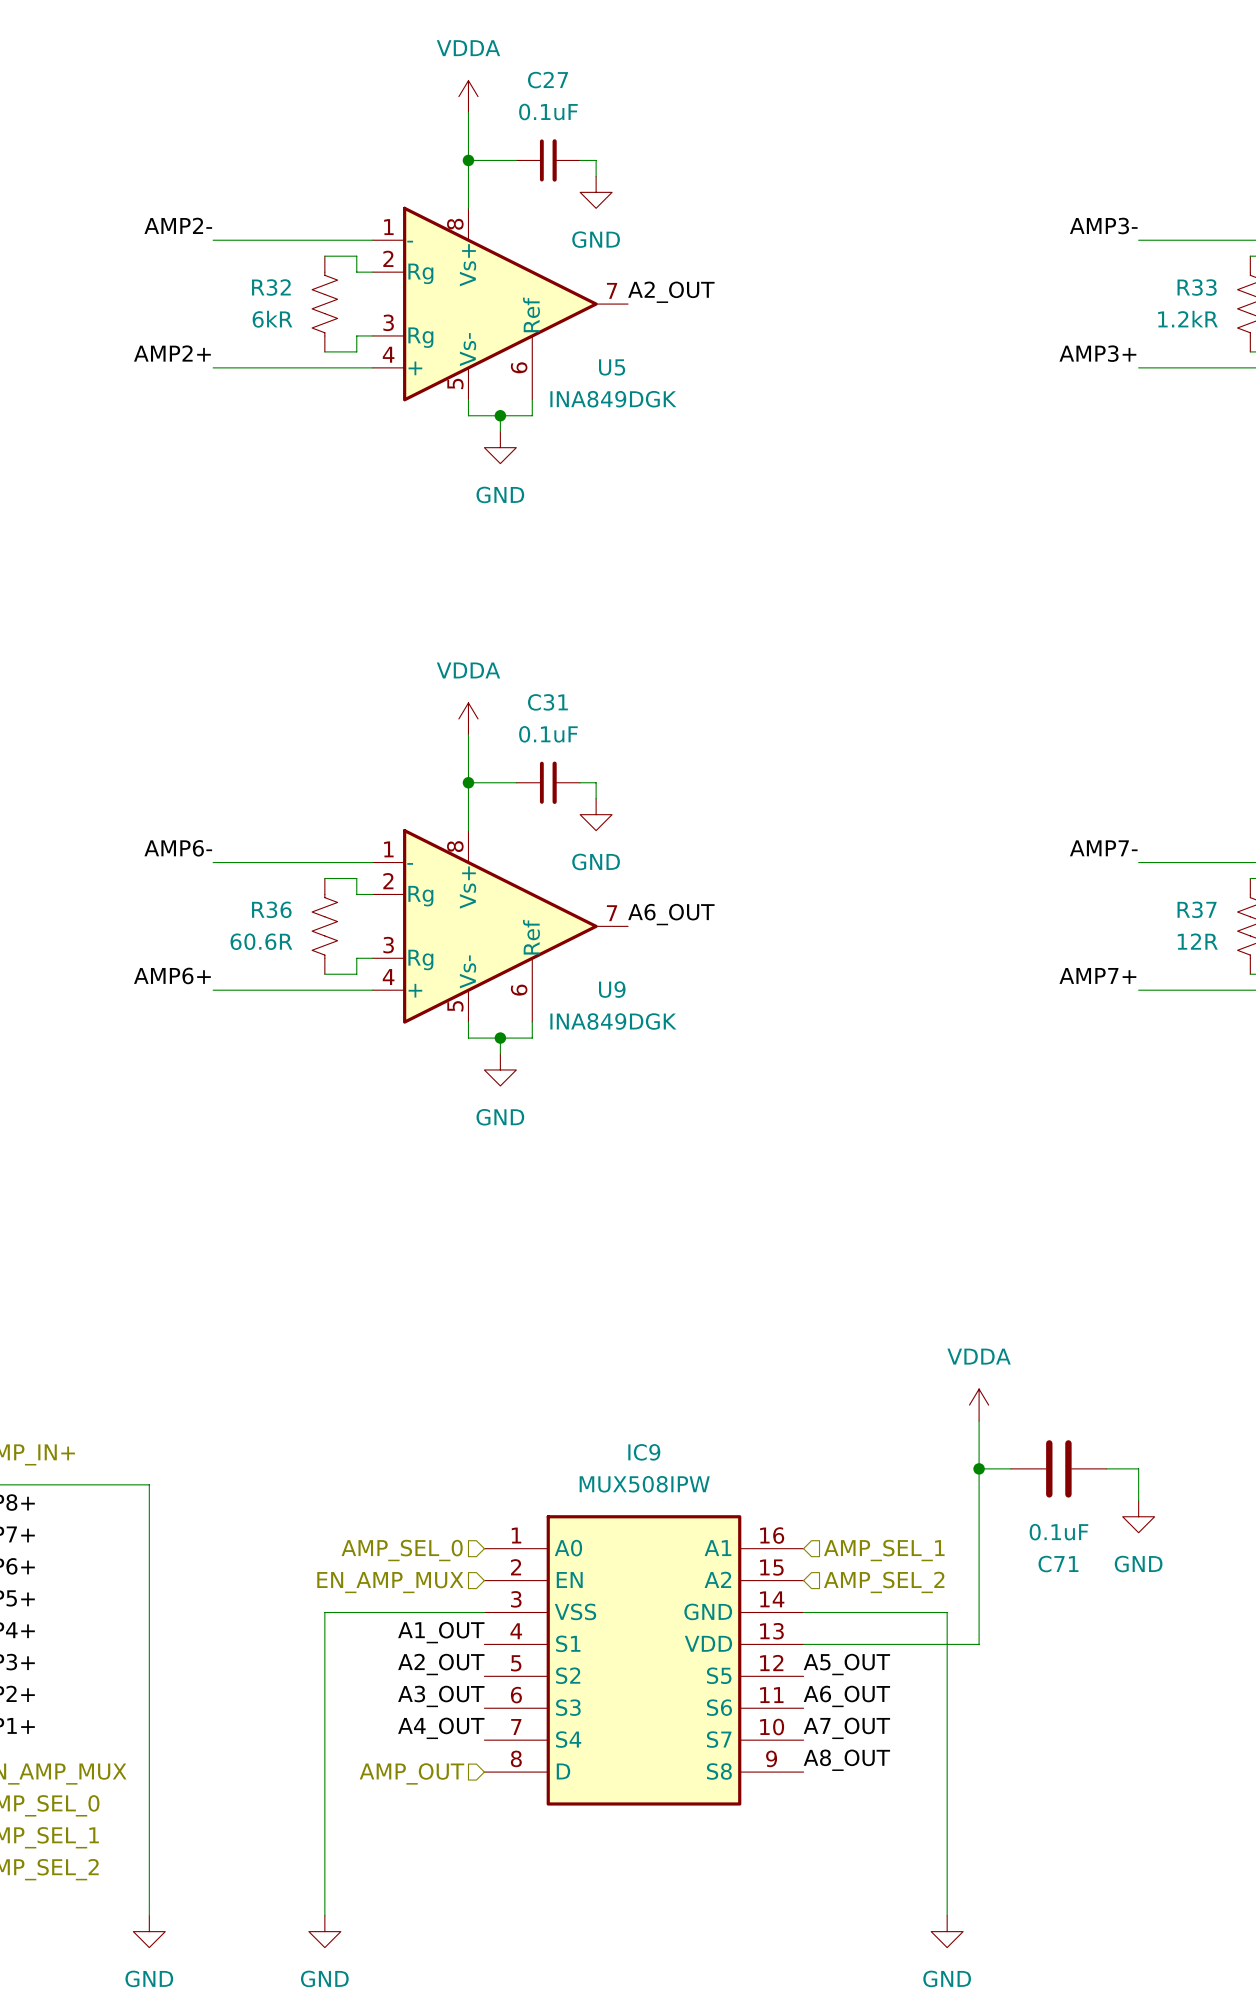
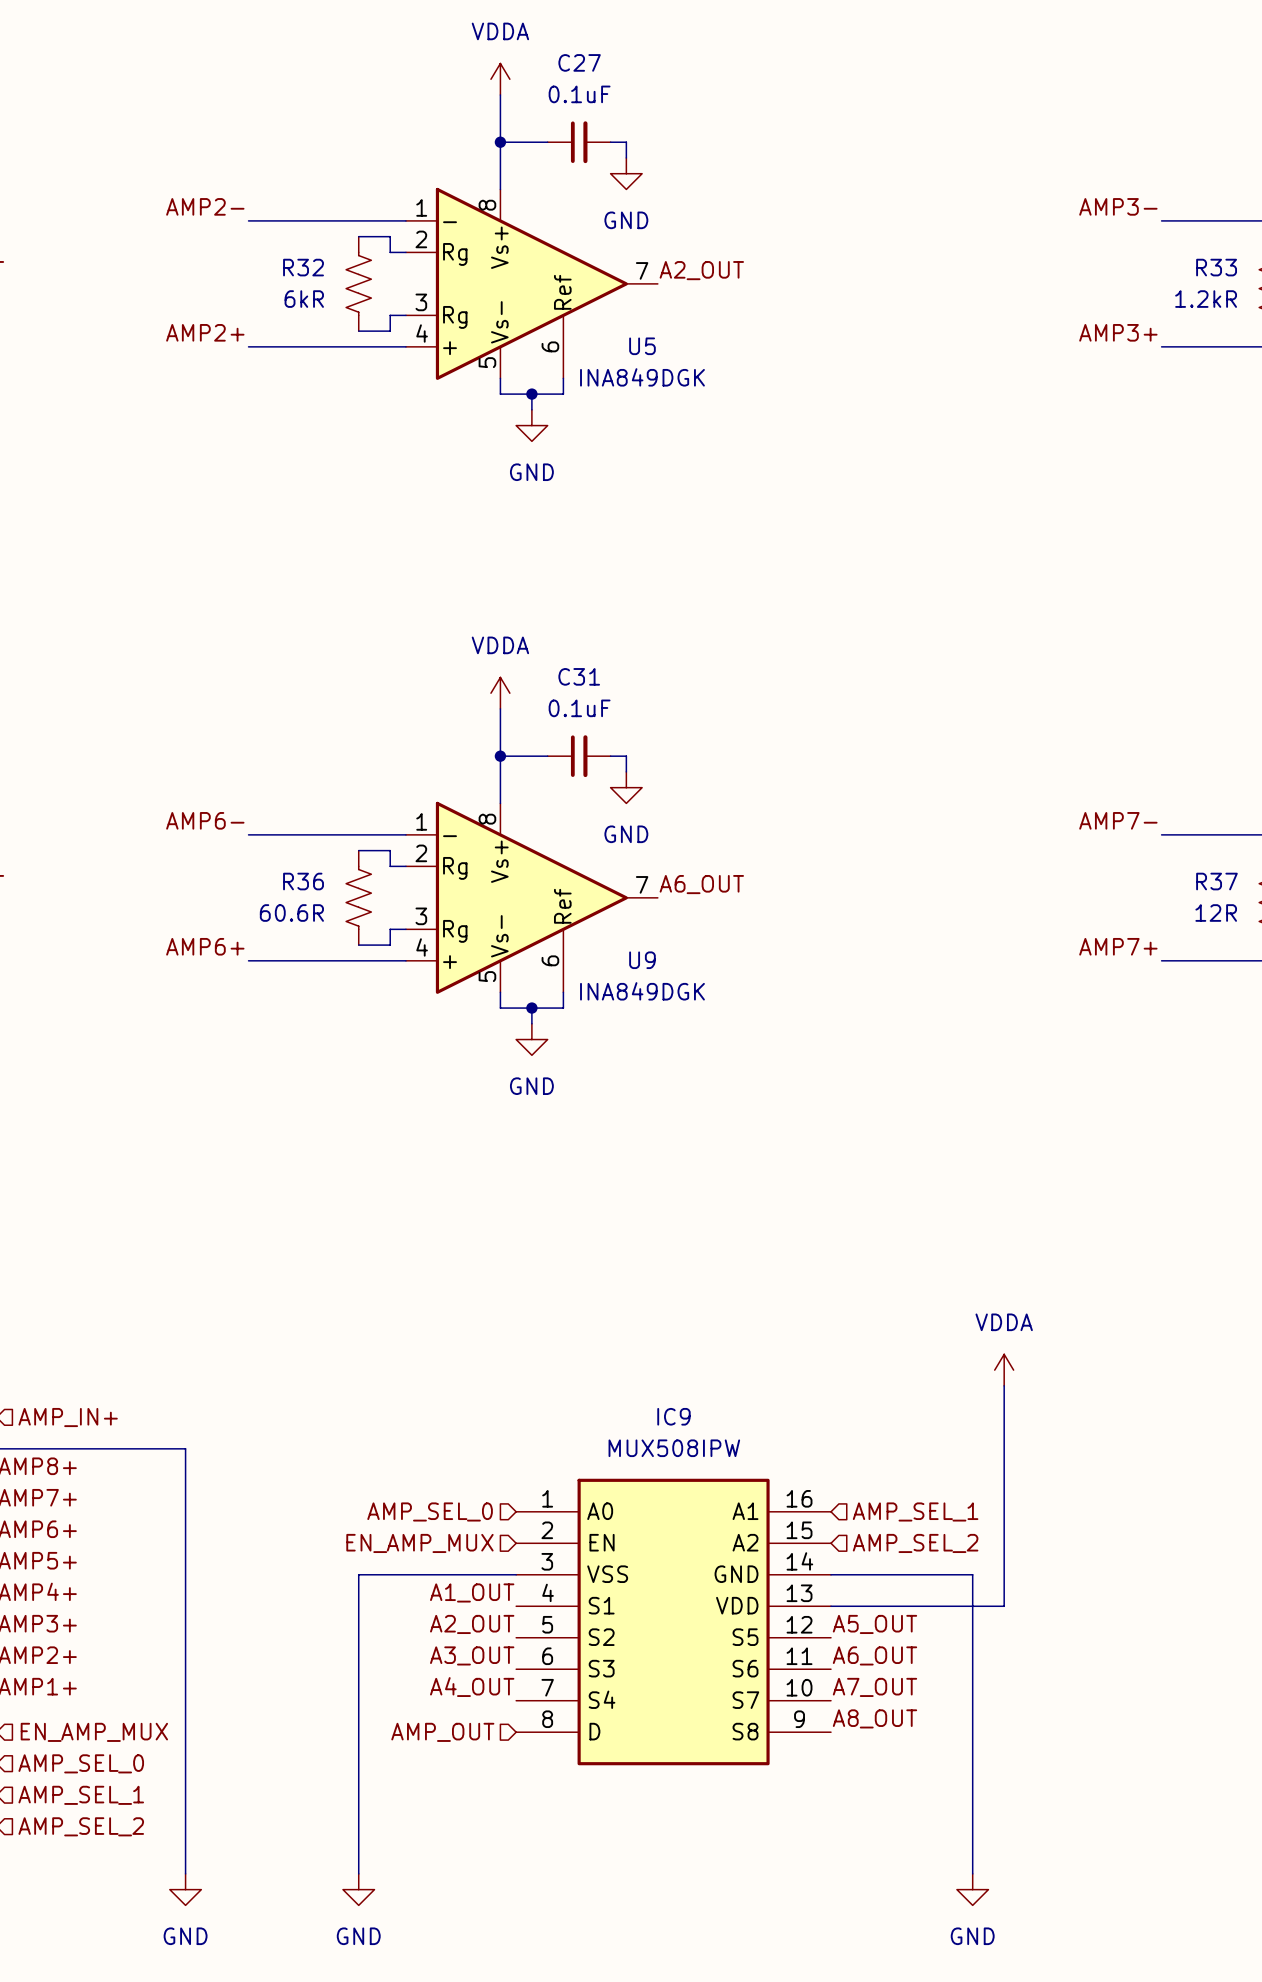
wire: (979, 1468) (1010, 1468) -> none
junction: (979, 1468) -> none
C71: 0.1uF (1058, 1468) -> none
wire: (1106, 1468) (1138, 1468) (1138, 1500) -> none
power symbol: GND (1138, 1516) -> none

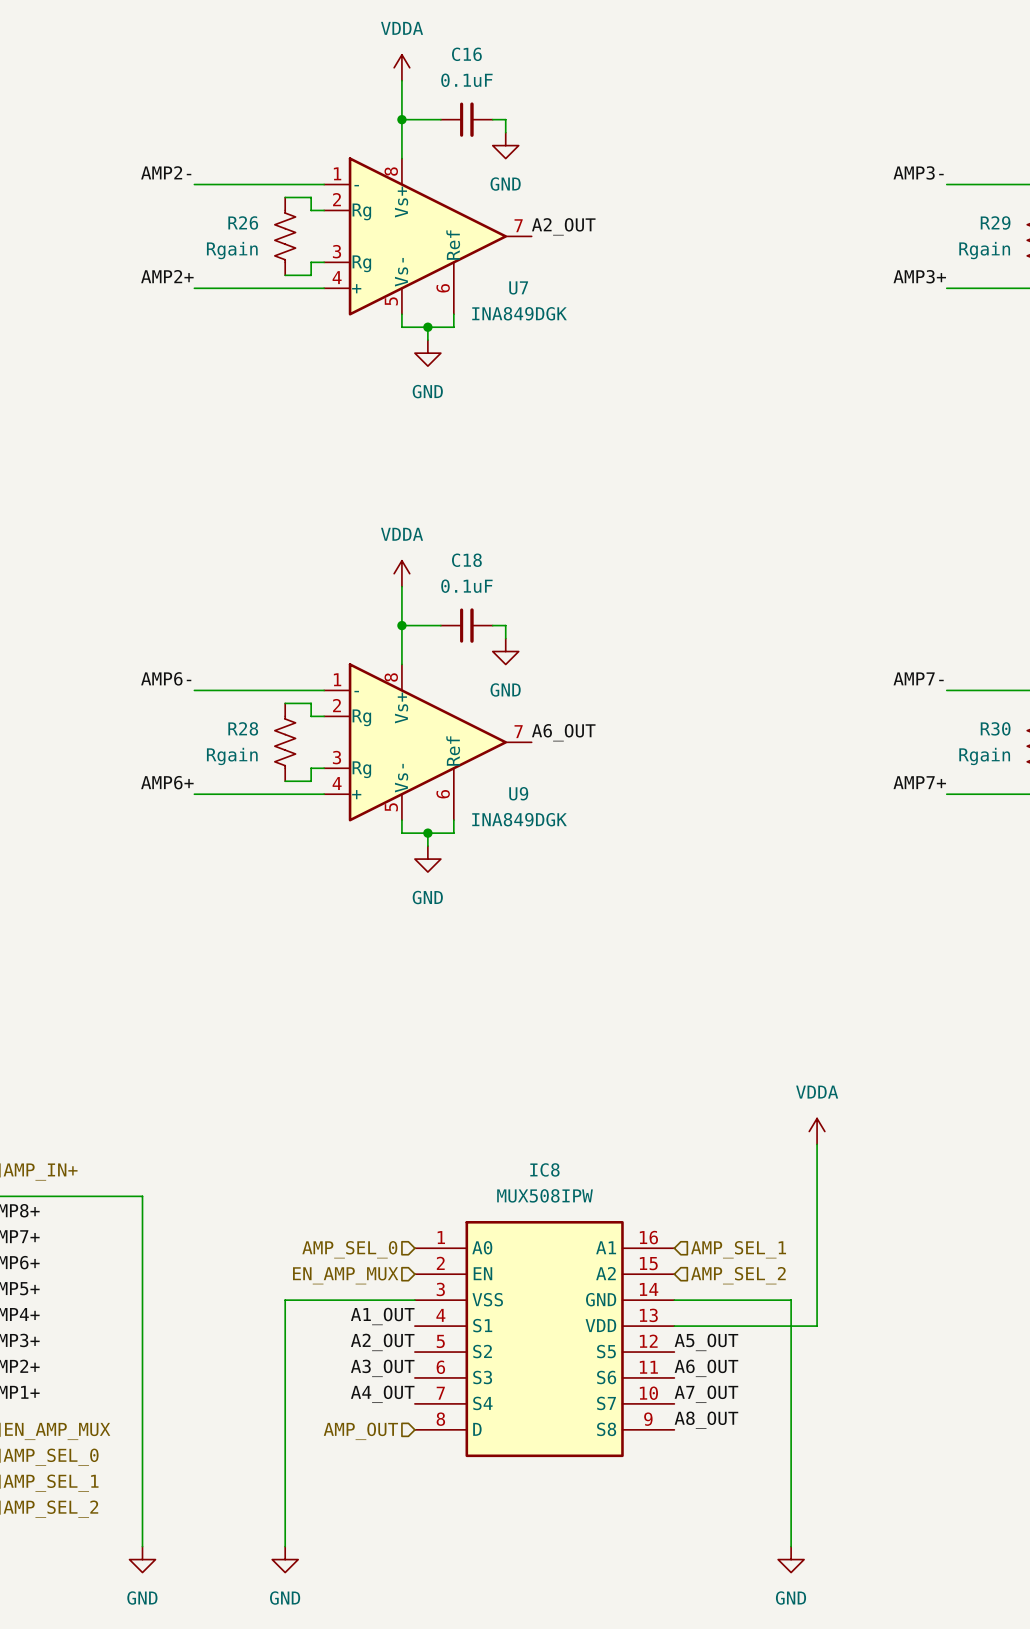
C27 name: C27 (579, 62) -> C16 (466, 54)
R32 name: R32 (303, 267) -> R26 (243, 222)
R33 name: R33 (1216, 267) -> R29 (995, 222)
R32 value: 6kR (304, 299) -> Rgain (232, 250)
R33 value: 1.2kR (1206, 299) -> Rgain (984, 250)
U5 name: U5 (642, 346) -> U7 (518, 287)
C31 name: C31 (579, 676) -> C18 (466, 560)
R36 name: R36 (303, 881) -> R28 (243, 728)
R37 name: R37 (1216, 881) -> R30 (995, 728)
R36 value: 60.6R (291, 913) -> Rgain (232, 756)
R37 value: 12R (1216, 913) -> Rgain (984, 756)
IC9 name: IC9 (673, 1416) -> IC8 (544, 1169)

